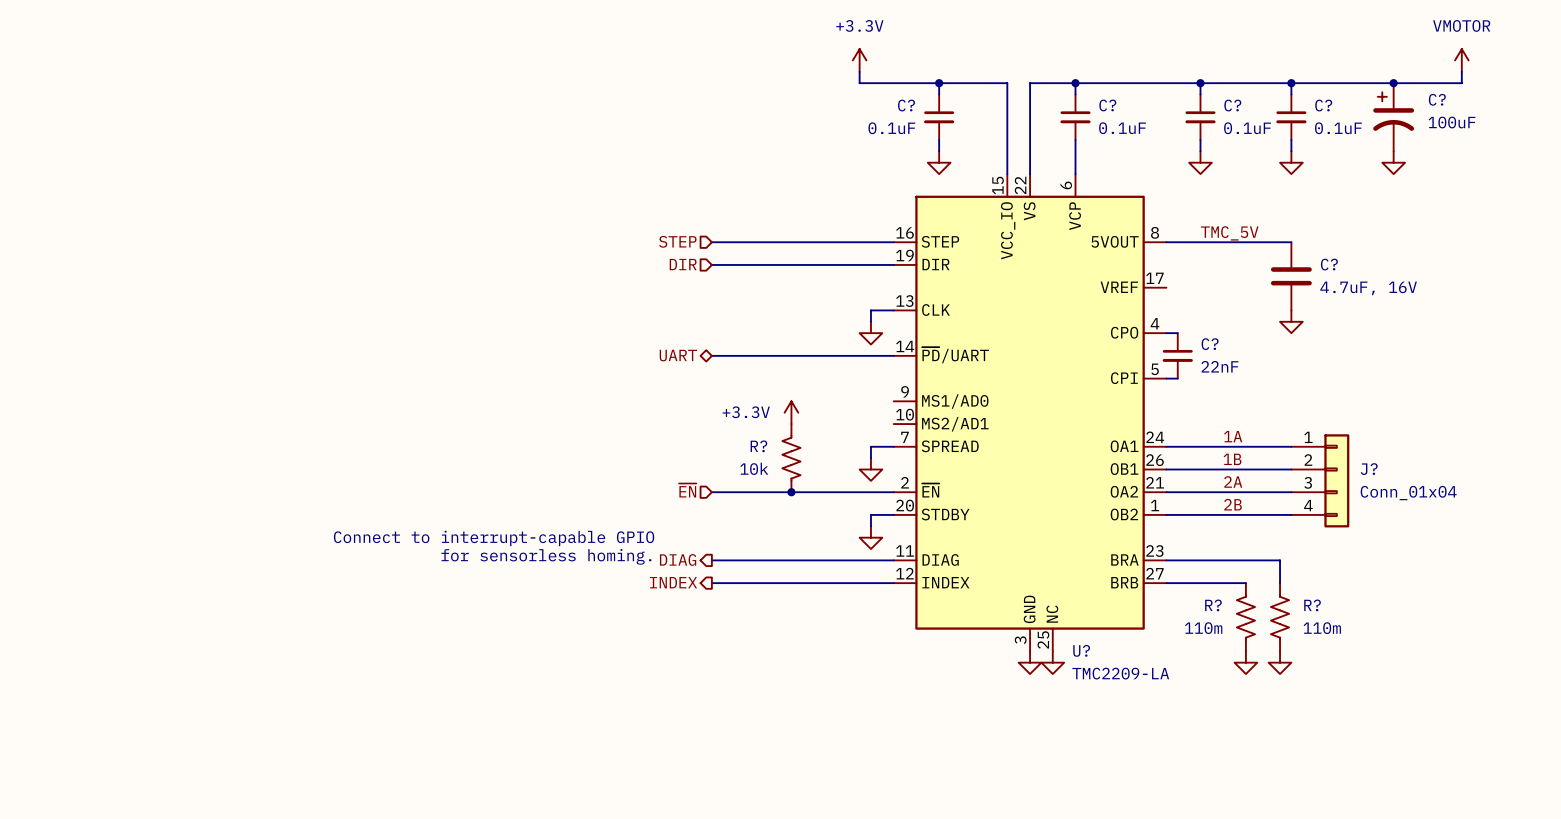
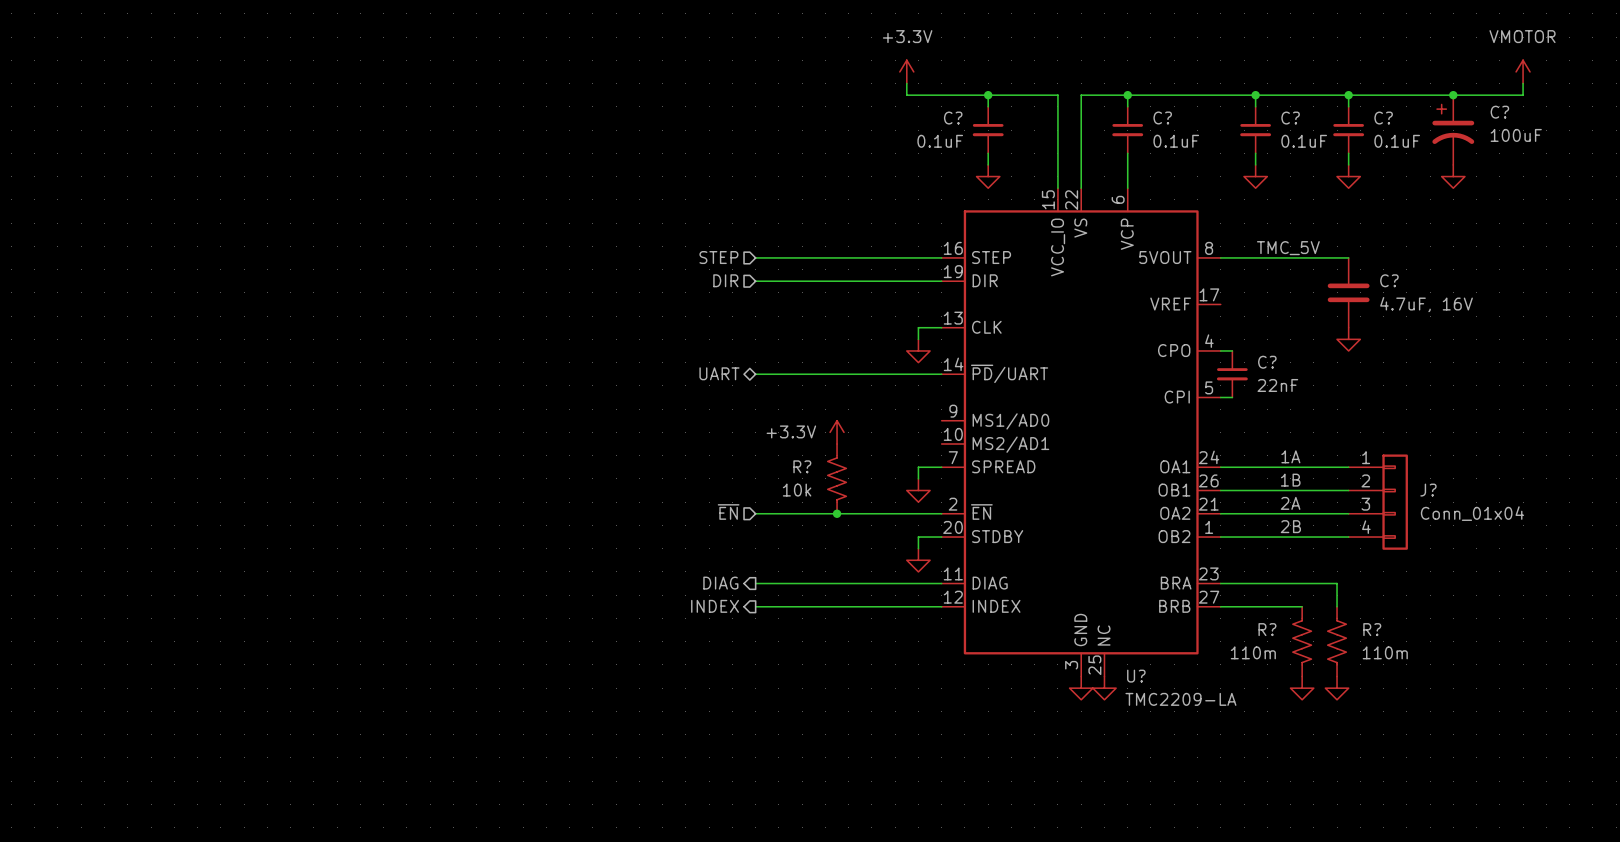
text: Connect to interrupt-capable GPIO (494, 538) -> none
text: for sensorless homing. (546, 556) -> none

